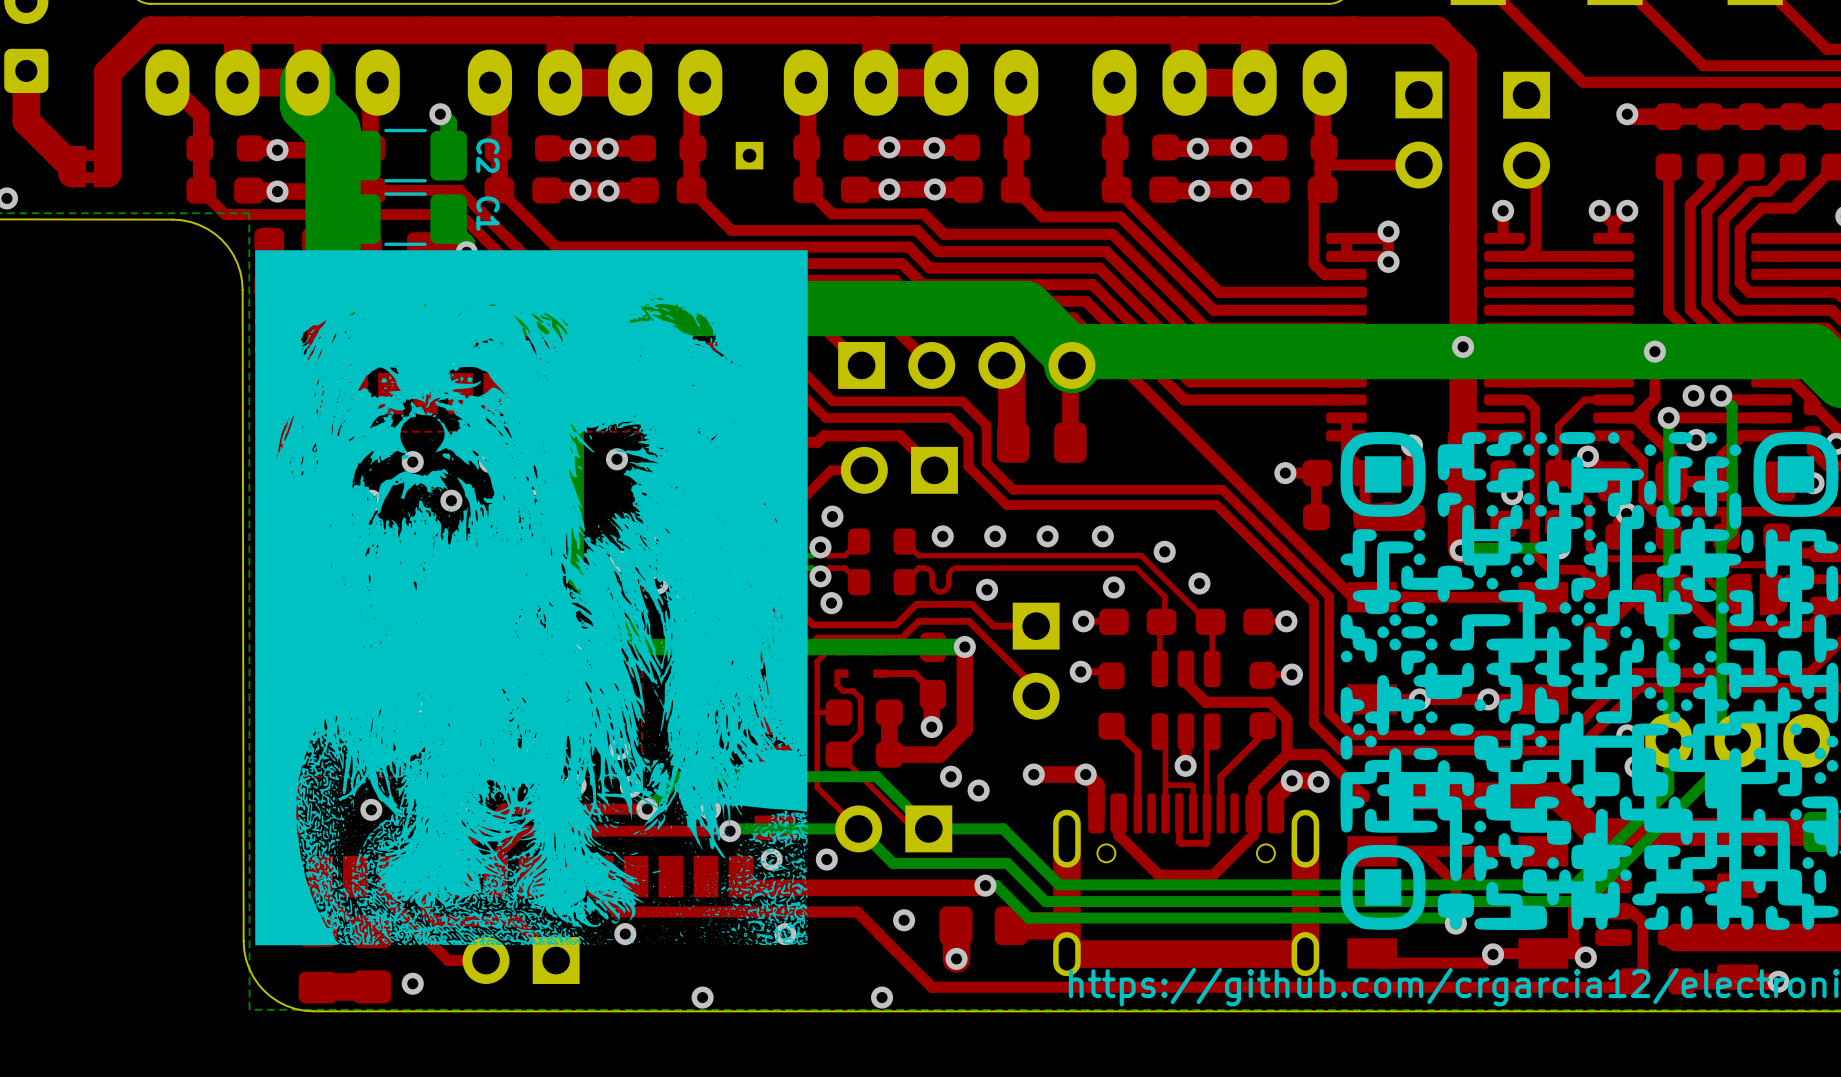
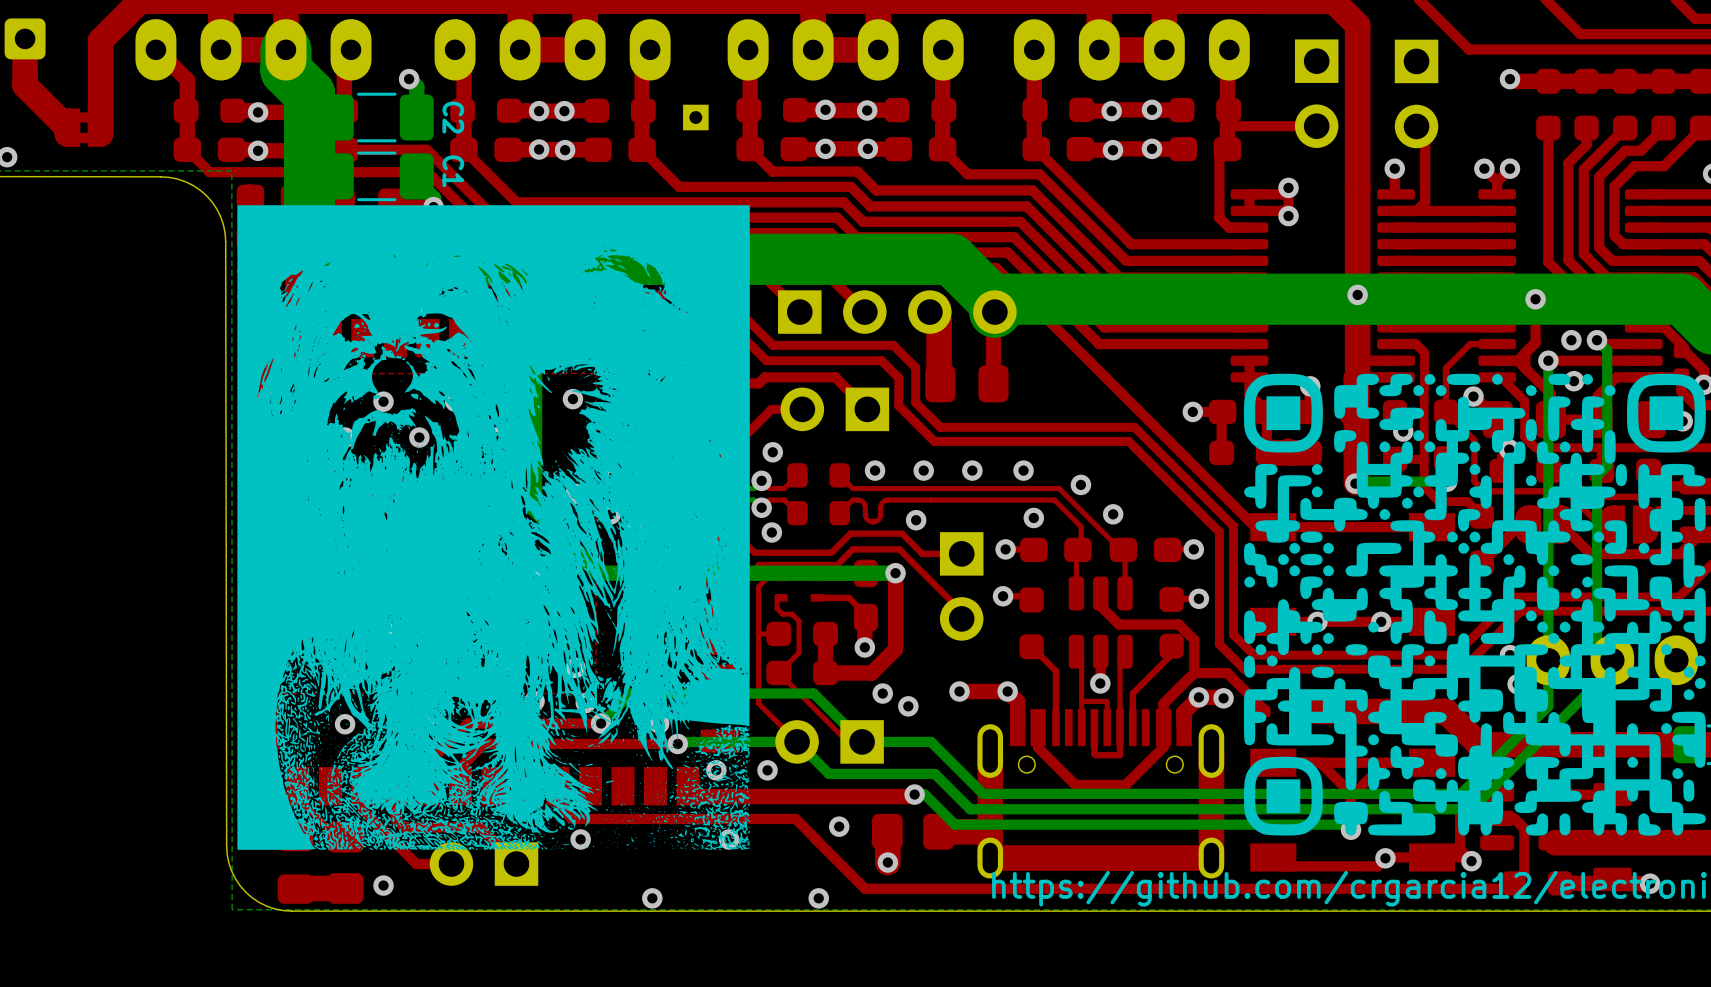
part footprint: [1053, 793, 1320, 977] -> [977, 709, 1225, 879]

